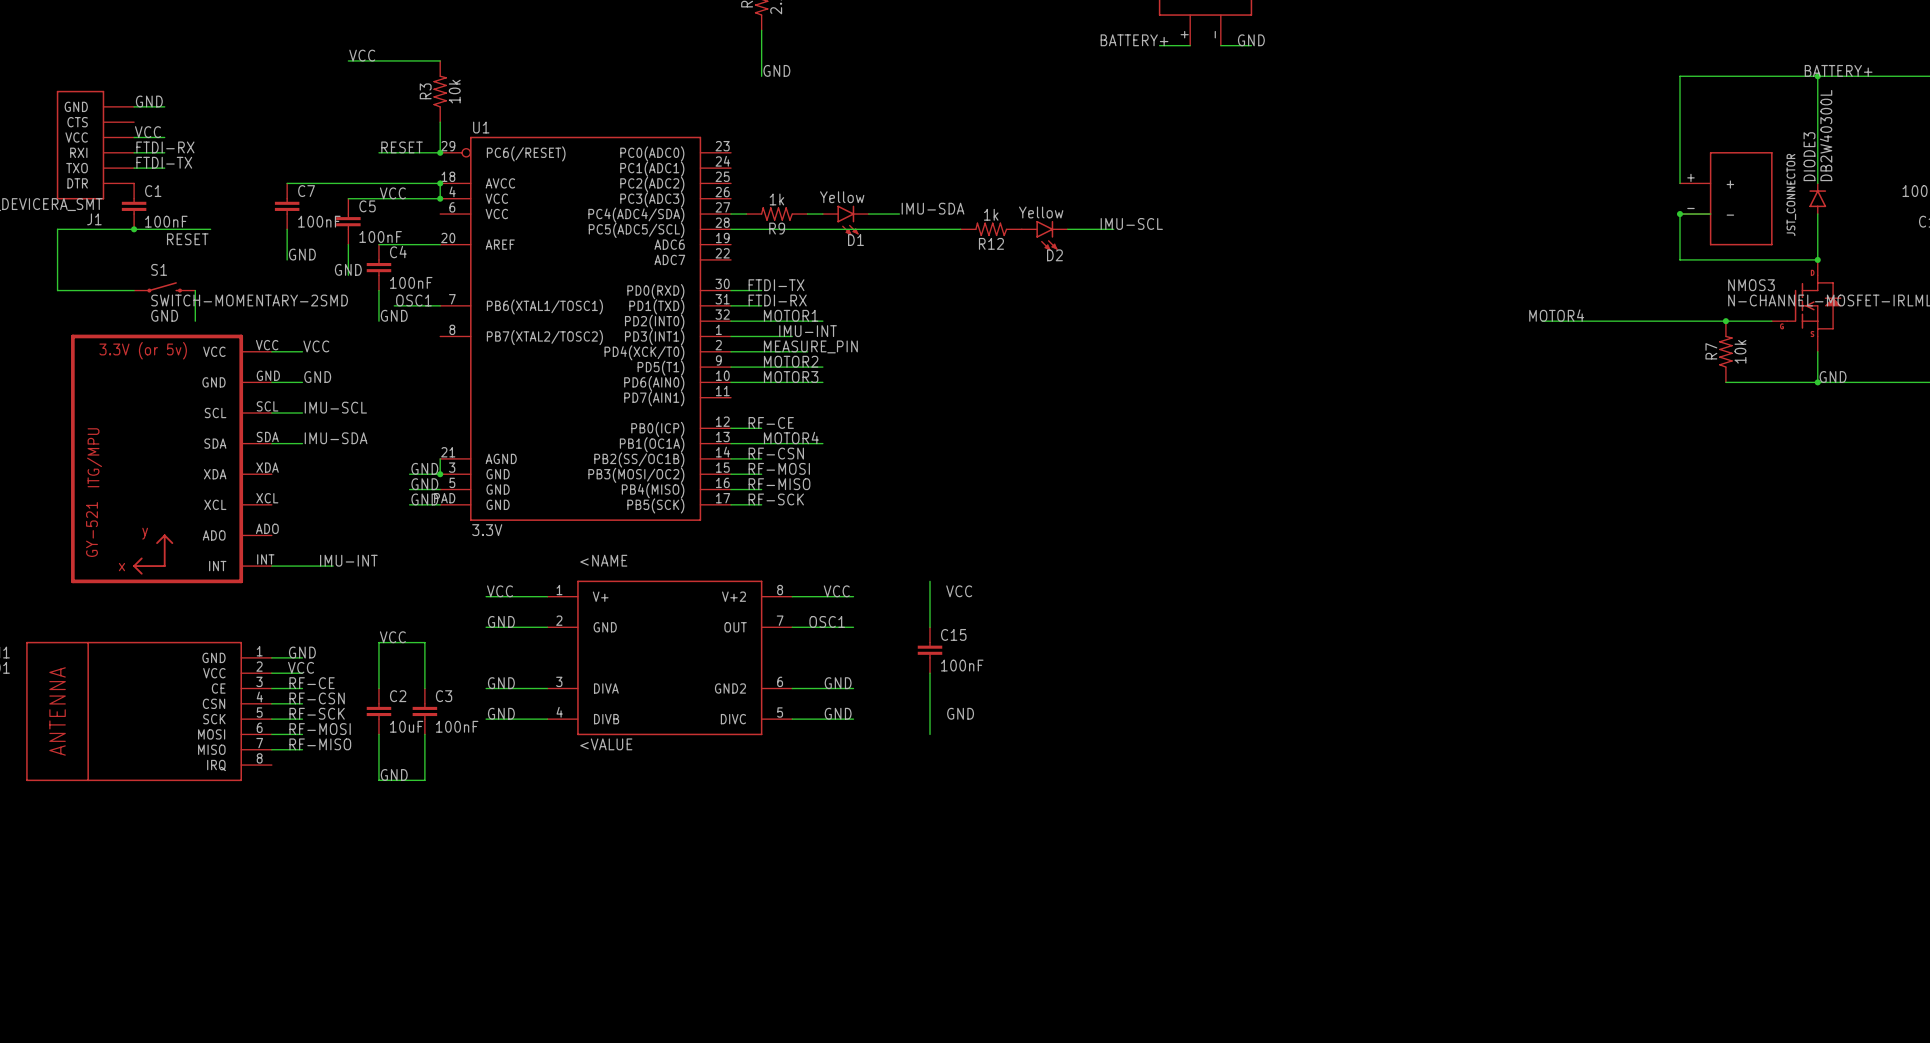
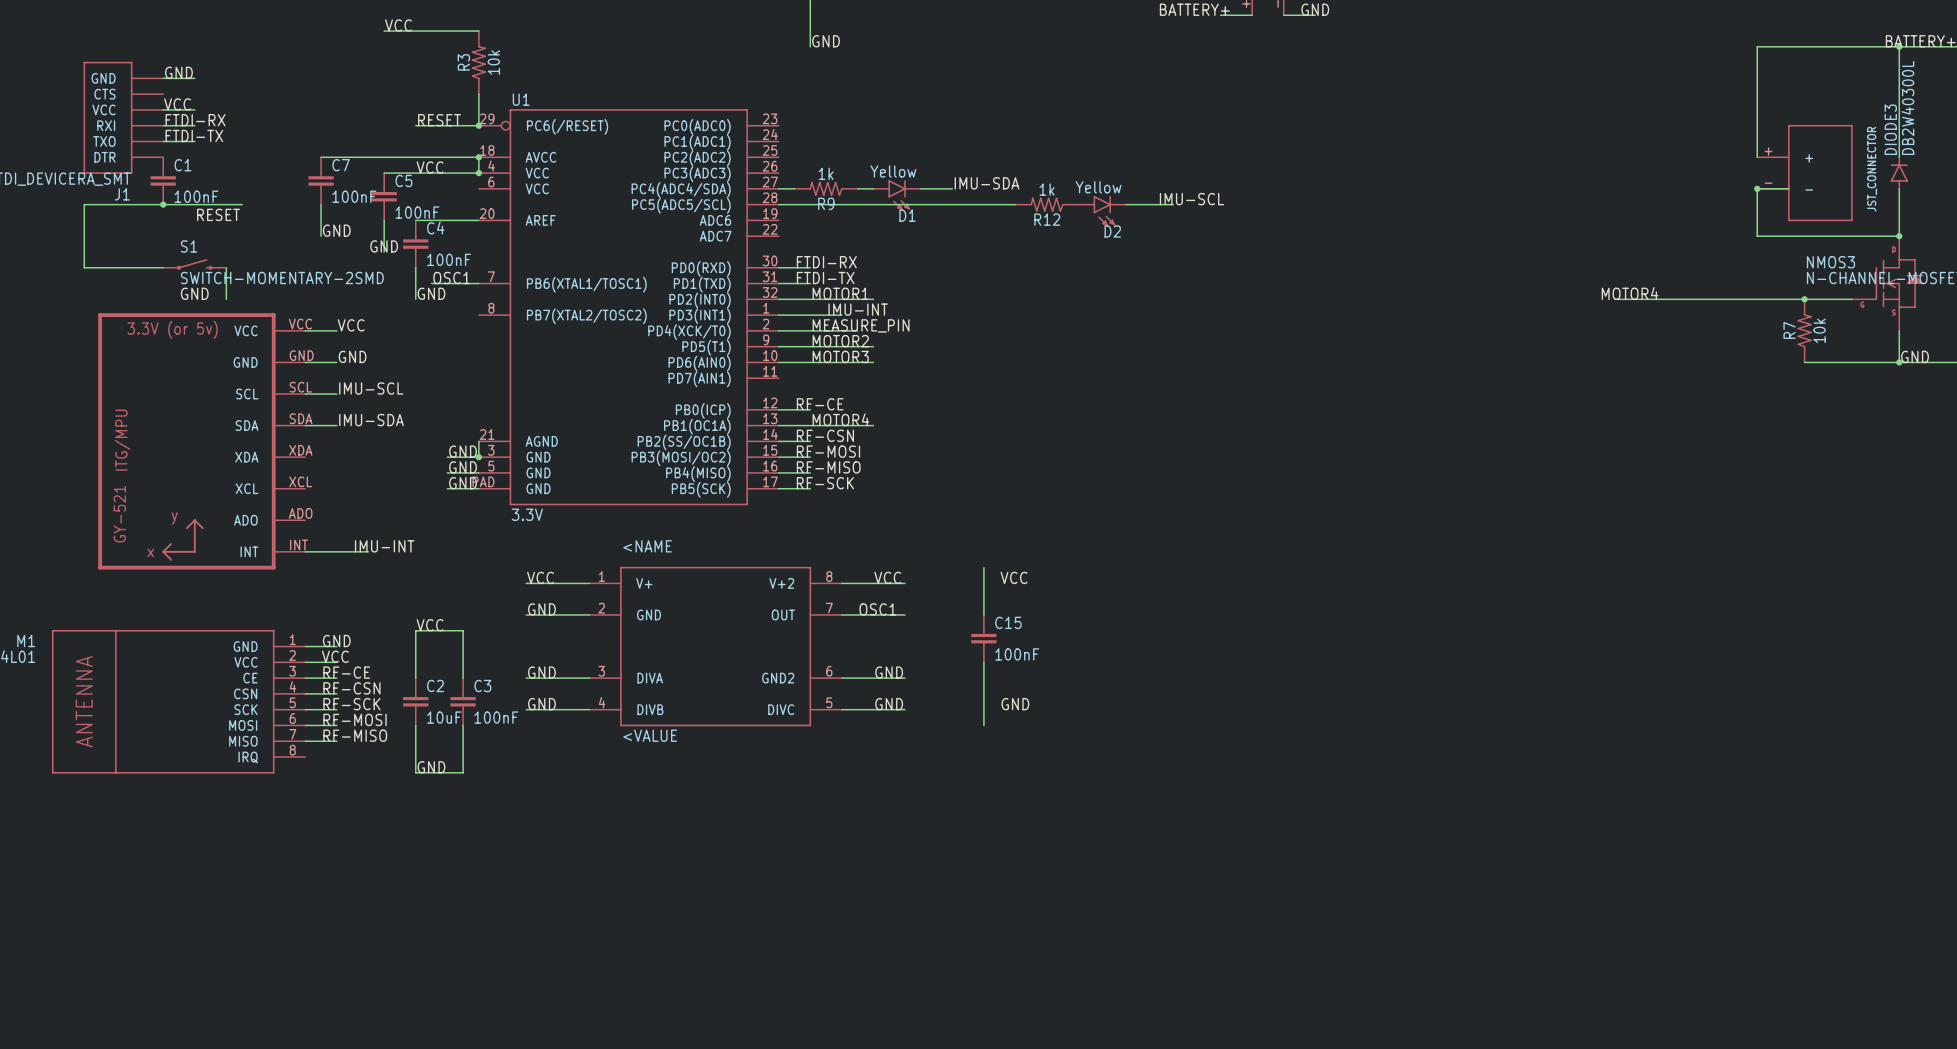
label: FTDI-TX (776, 285) -> FTDI-RX (826, 262)
label: FTDI-RX (777, 300) -> FTDI-TX (825, 278)

